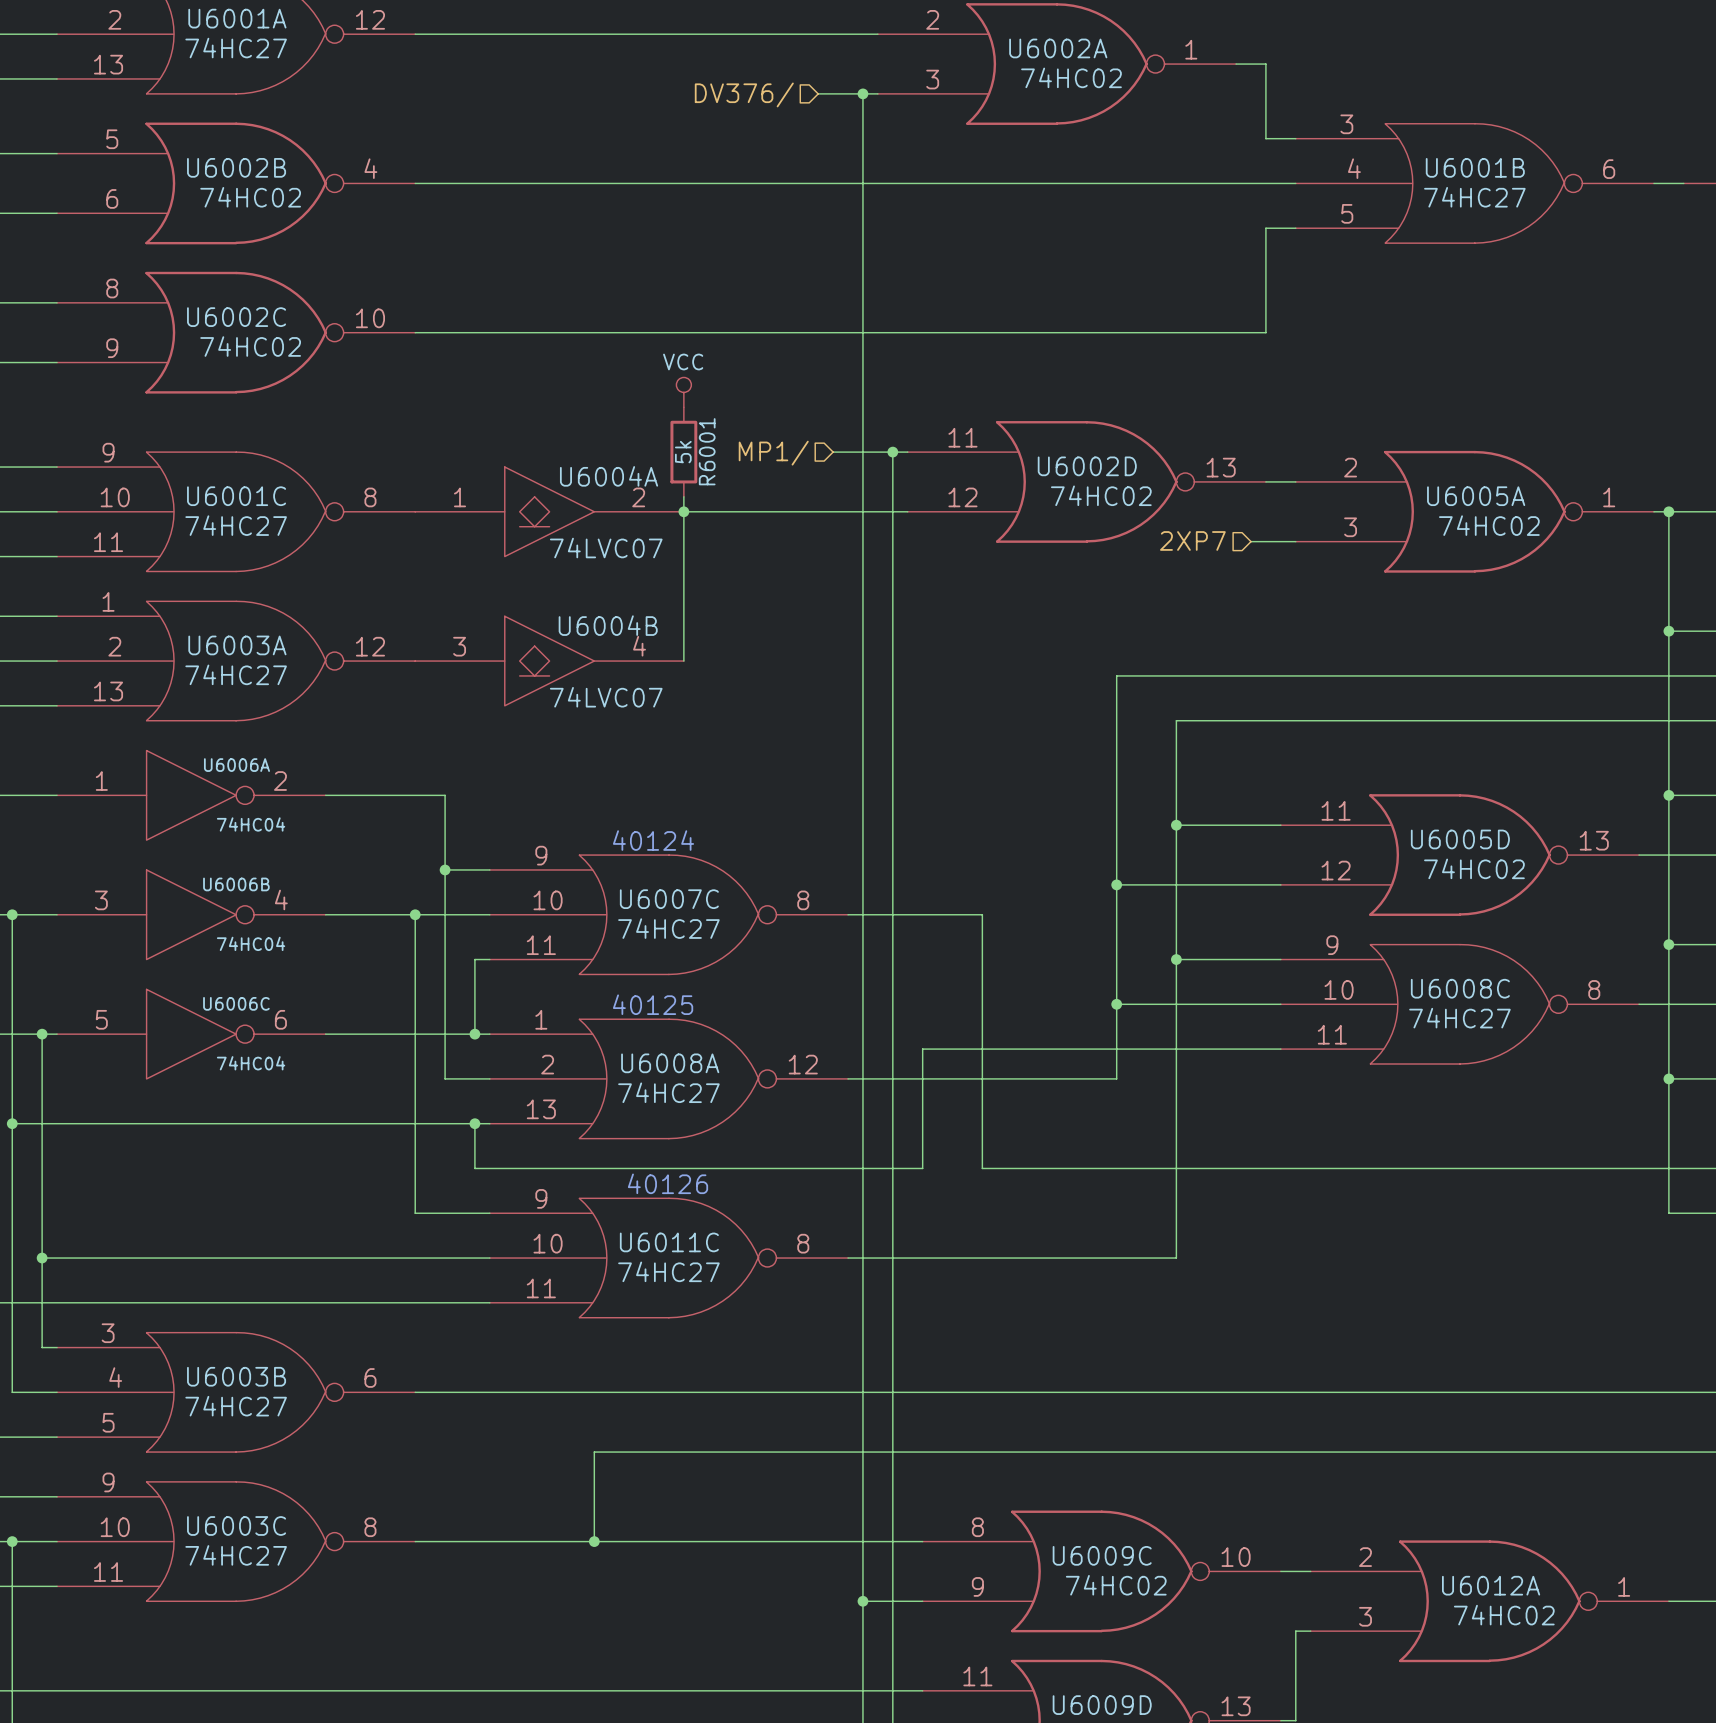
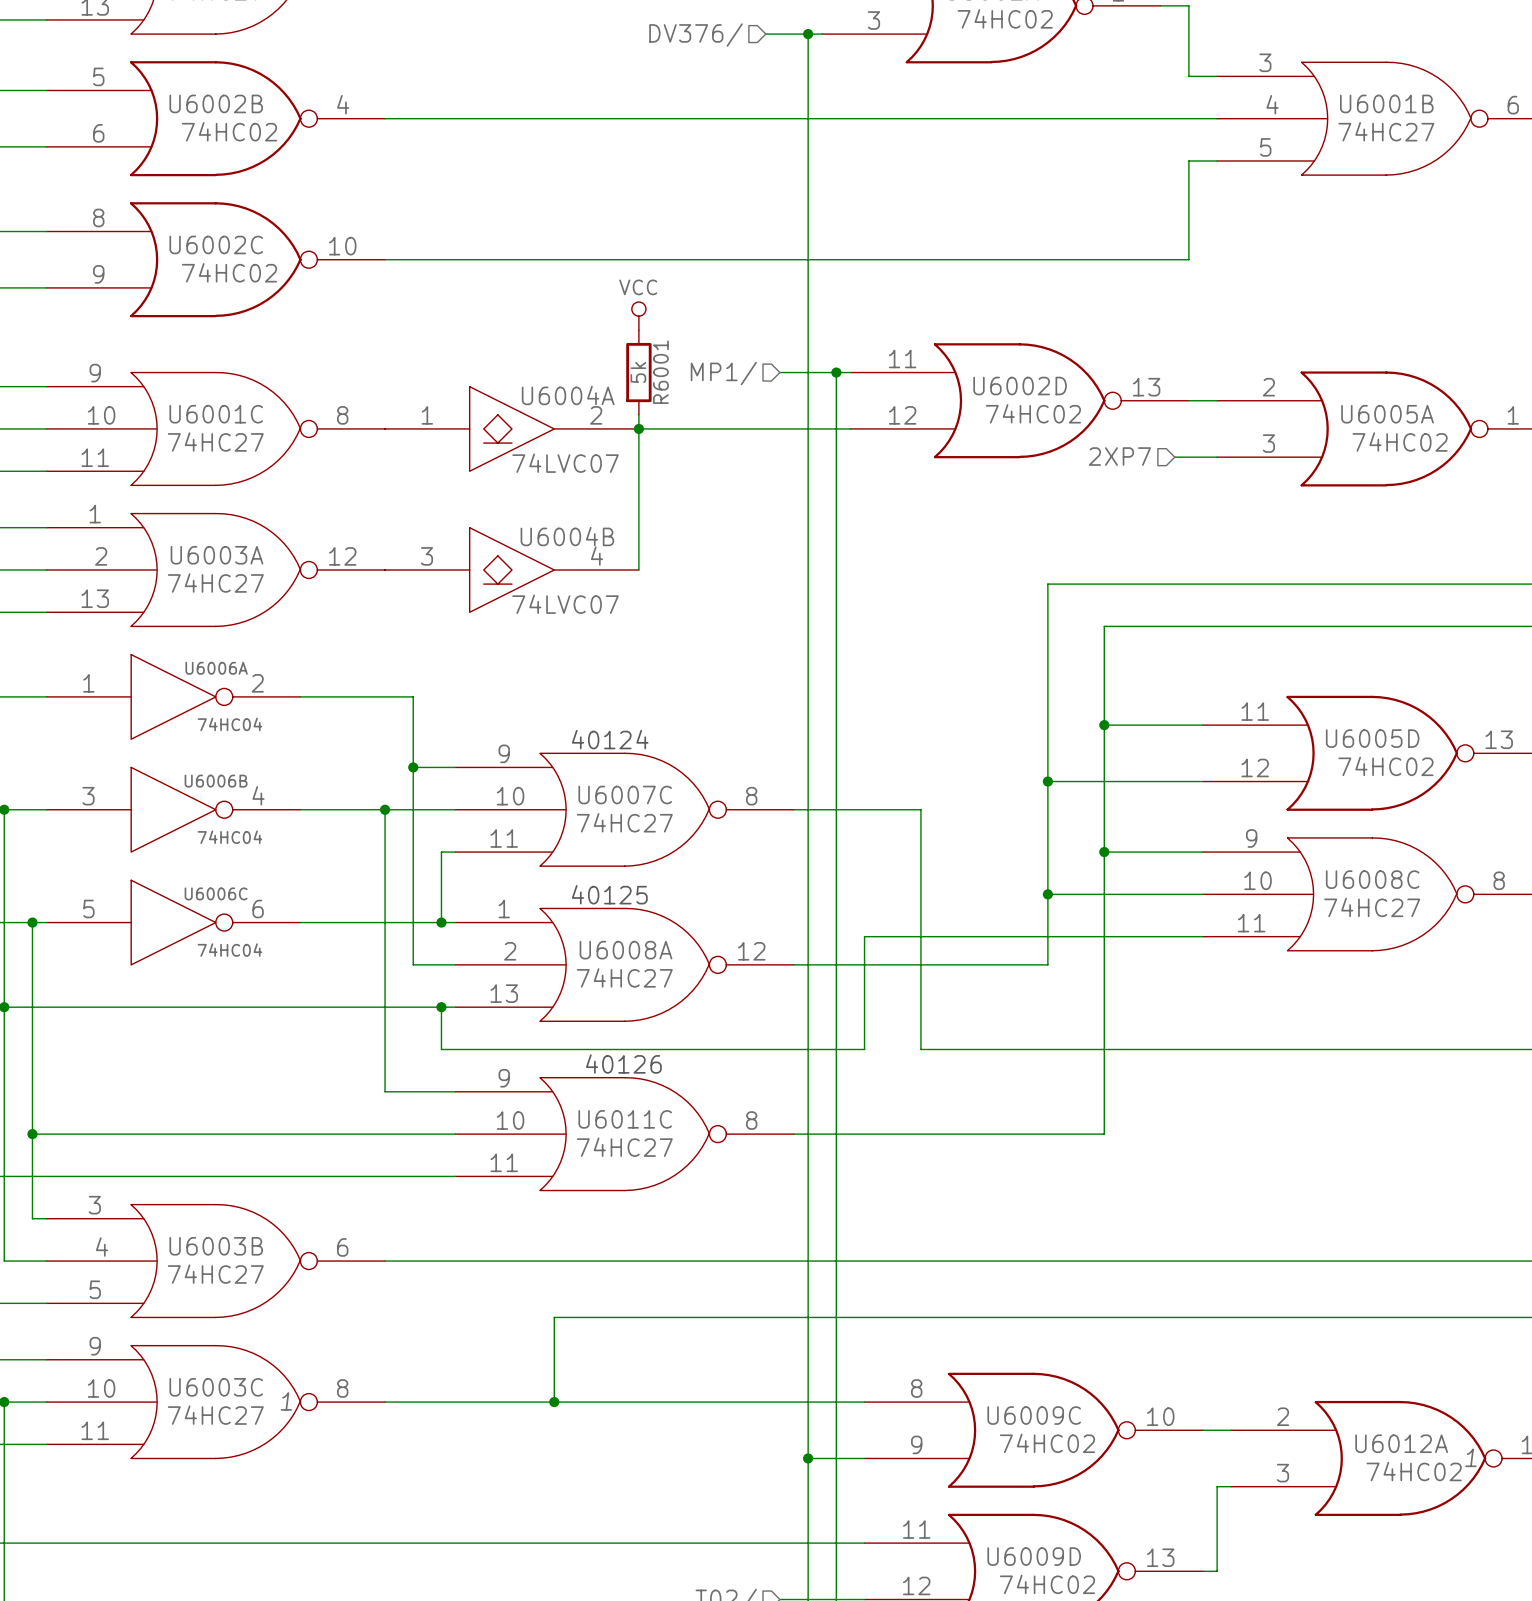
U6003C text: none -> 1 (286, 1401)
U6012A text: none -> 1 (1470, 1457)

